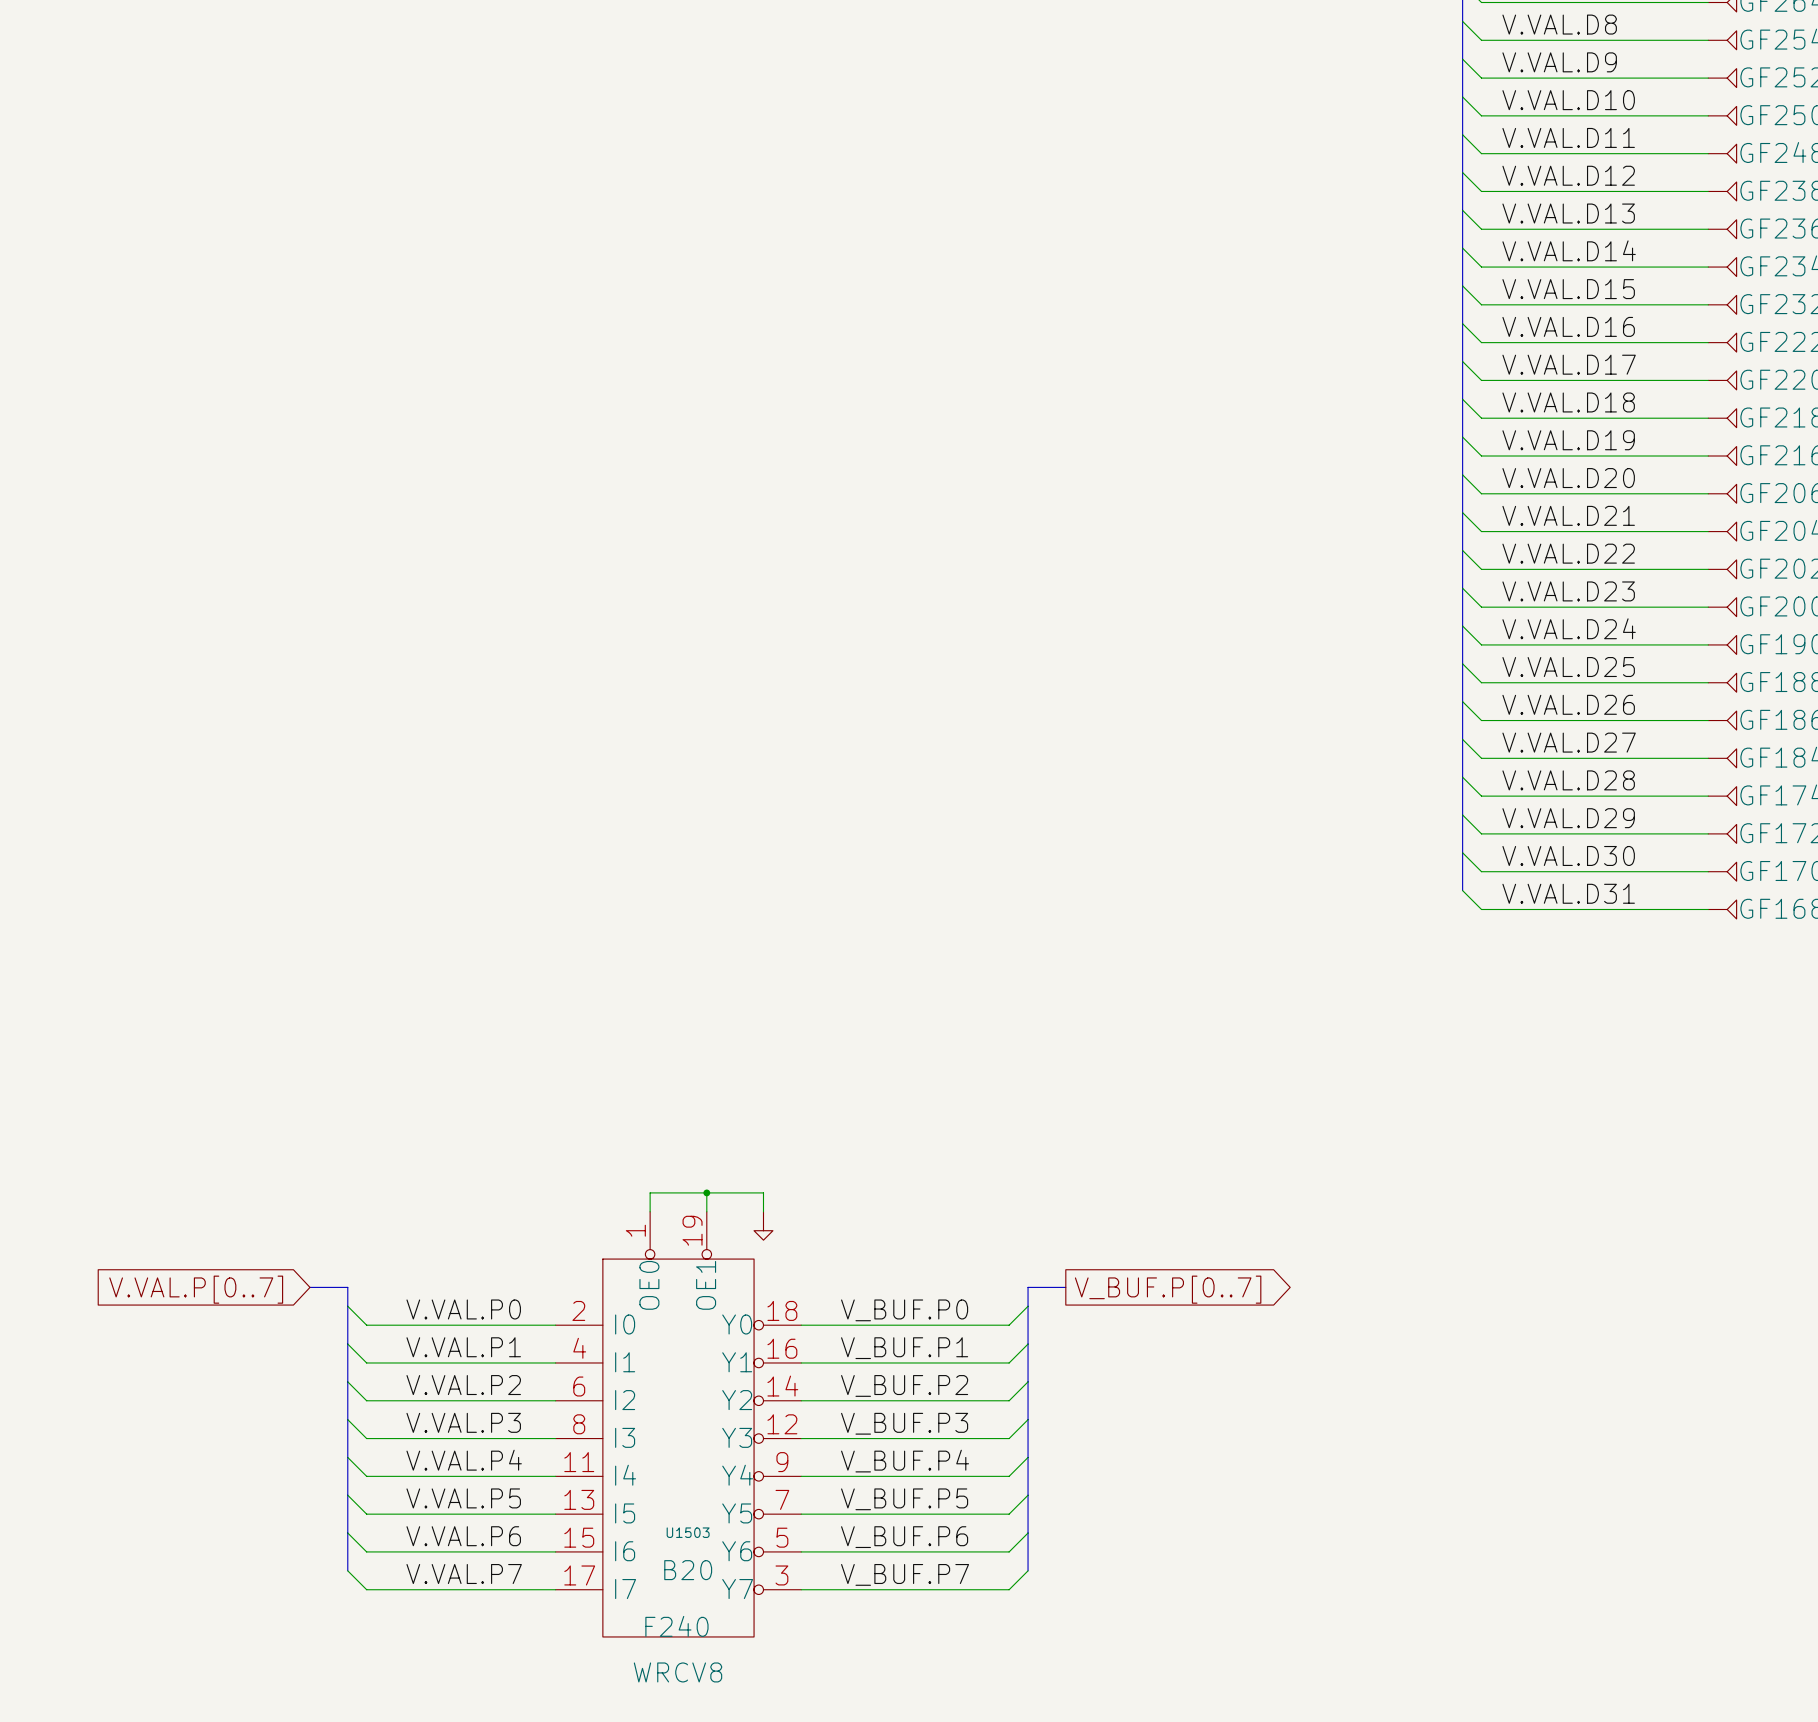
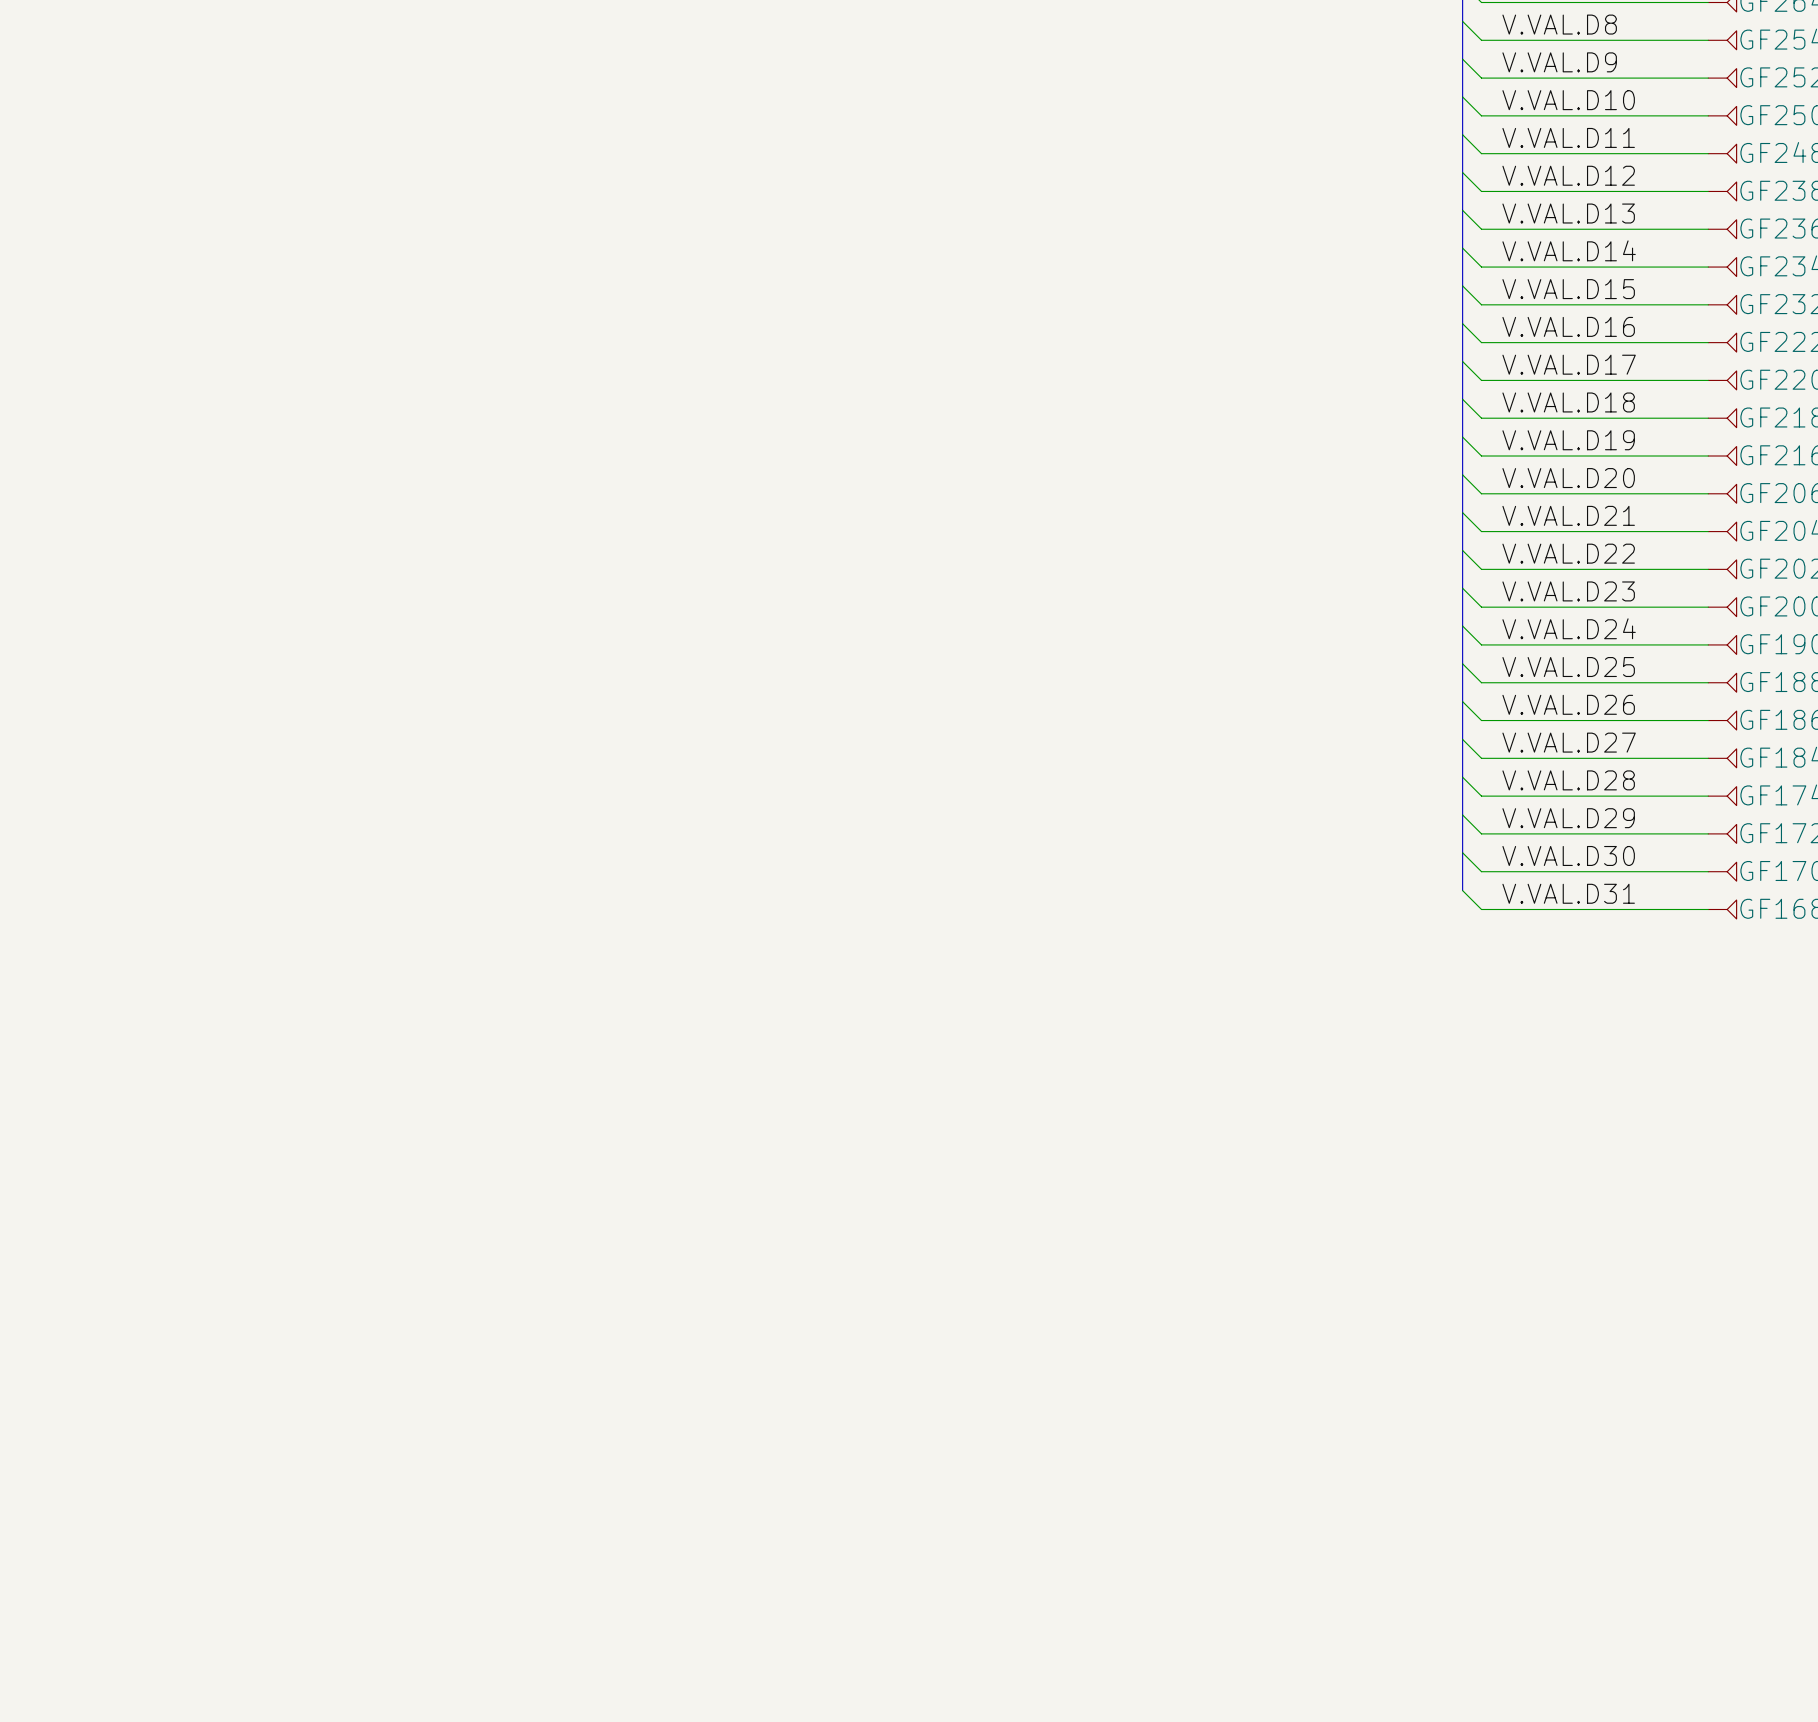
wire: (706, 1192) (706, 1211) -> none
junction: (706, 1192) -> none
wire: (650, 1211) (650, 1192) (763, 1192) (763, 1211) -> none
power symbol: (763, 1226) -> none
bus: (309, 1287) (347, 1287) (347, 1570) -> none
bus: (1065, 1287) (1028, 1287) (1028, 1570) -> none
global label: V.VAL.P[0..7] (196, 1289) -> none
global label: V_BUF.P[0..7] (1168, 1289) -> none
wire: (347, 1306) (366, 1325) (555, 1325) -> none
wire: (1028, 1306) (1009, 1325) (801, 1325) -> none
label: V.VAL.P0 (463, 1309) -> none
label: V_BUF.P0 (904, 1310) -> none
wire: (347, 1344) (366, 1362) (555, 1362) -> none
wire: (1028, 1344) (1009, 1362) (801, 1362) -> none
label: V.VAL.P1 (463, 1347) -> none
label: V_BUF.P1 (904, 1348) -> none
wire: (347, 1381) (366, 1400) (555, 1400) -> none
wire: (1028, 1381) (1009, 1400) (801, 1400) -> none
label: V.VAL.P2 (463, 1385) -> none
label: V_BUF.P2 (904, 1385) -> none
wire: (347, 1419) (366, 1438) (555, 1438) -> none
wire: (1028, 1419) (1009, 1438) (801, 1438) -> none
label: V.VAL.P3 (463, 1422) -> none
label: V_BUF.P3 (904, 1423) -> none
U1503: F240 (678, 1424) -> none
wire: (347, 1457) (366, 1476) (555, 1476) -> none
wire: (1028, 1457) (1009, 1476) (801, 1476) -> none
label: V.VAL.P4 (464, 1460) -> none
label: V_BUF.P4 (905, 1461) -> none
wire: (347, 1495) (366, 1514) (555, 1514) -> none
wire: (1028, 1495) (1009, 1514) (801, 1514) -> none
label: V.VAL.P5 (463, 1498) -> none
label: V_BUF.P5 (904, 1499) -> none
wire: (347, 1533) (366, 1551) (555, 1551) -> none
wire: (1028, 1533) (1009, 1551) (801, 1551) -> none
label: V.VAL.P6 (463, 1536) -> none
label: V_BUF.P6 (904, 1537) -> none
wire: (347, 1570) (366, 1589) (555, 1589) -> none
wire: (1028, 1570) (1009, 1589) (801, 1589) -> none
label: V.VAL.P7 (464, 1574) -> none
label: V_BUF.P7 (905, 1574) -> none

